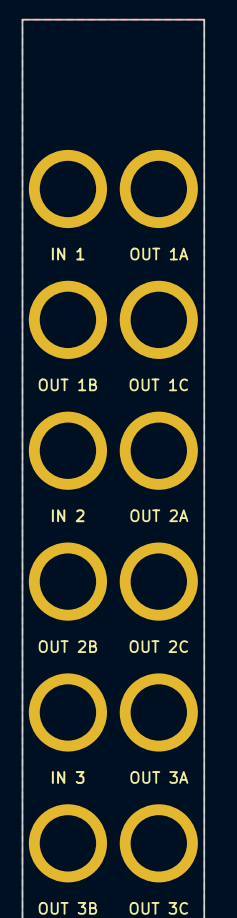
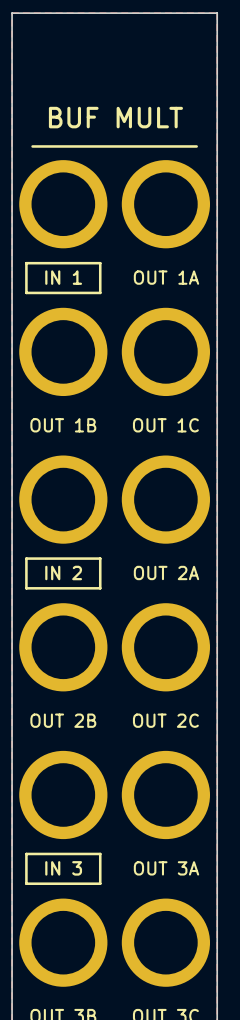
text: none -> BUF MULT (115, 117)
line: none -> (32, 146) (196, 146)
line: none -> (26, 263) (100, 263) (100, 292) (26, 292) (26, 263)
line: none -> (26, 558) (26, 588) (100, 588) (100, 558) (26, 558)
line: none -> (26, 853) (26, 883) (100, 883) (100, 853) (26, 853)

